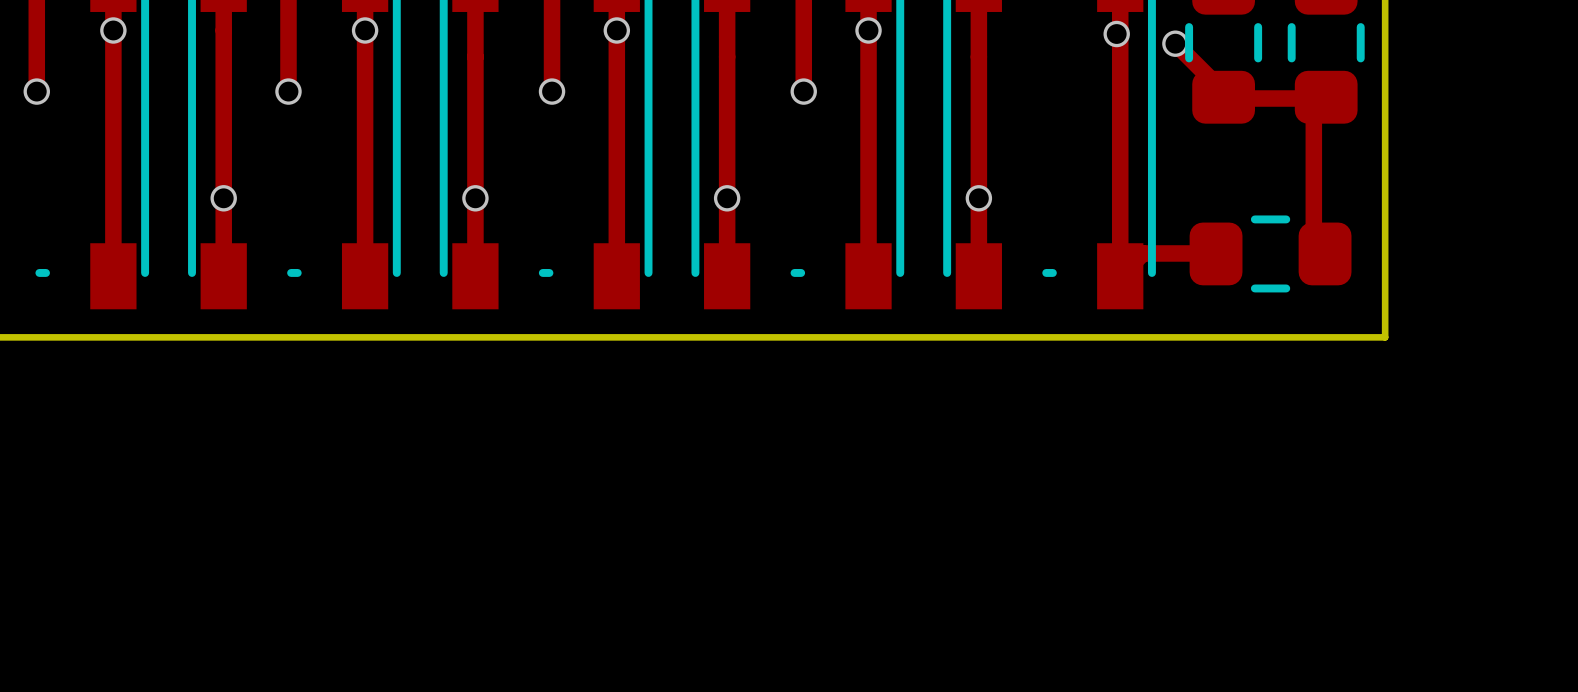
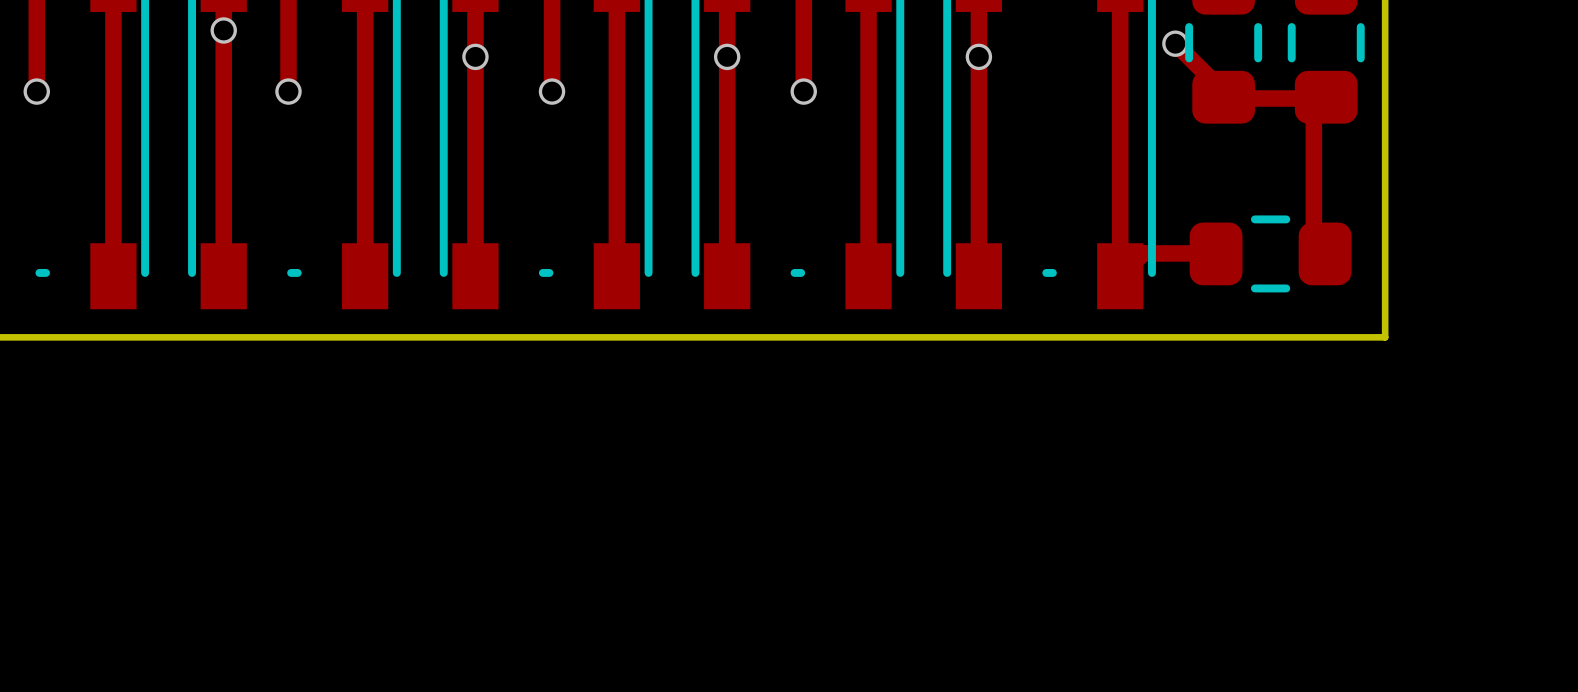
via: (113, 30) -> none
via: none -> (223, 30)
via: (365, 30) -> none
via: (616, 30) -> none
via: (868, 30) -> none
via: (1116, 34) -> none
via: none -> (475, 56)
via: none -> (727, 56)
via: none -> (978, 56)
via: (223, 198) -> none
via: (475, 198) -> none
via: (727, 198) -> none
via: (978, 198) -> none

